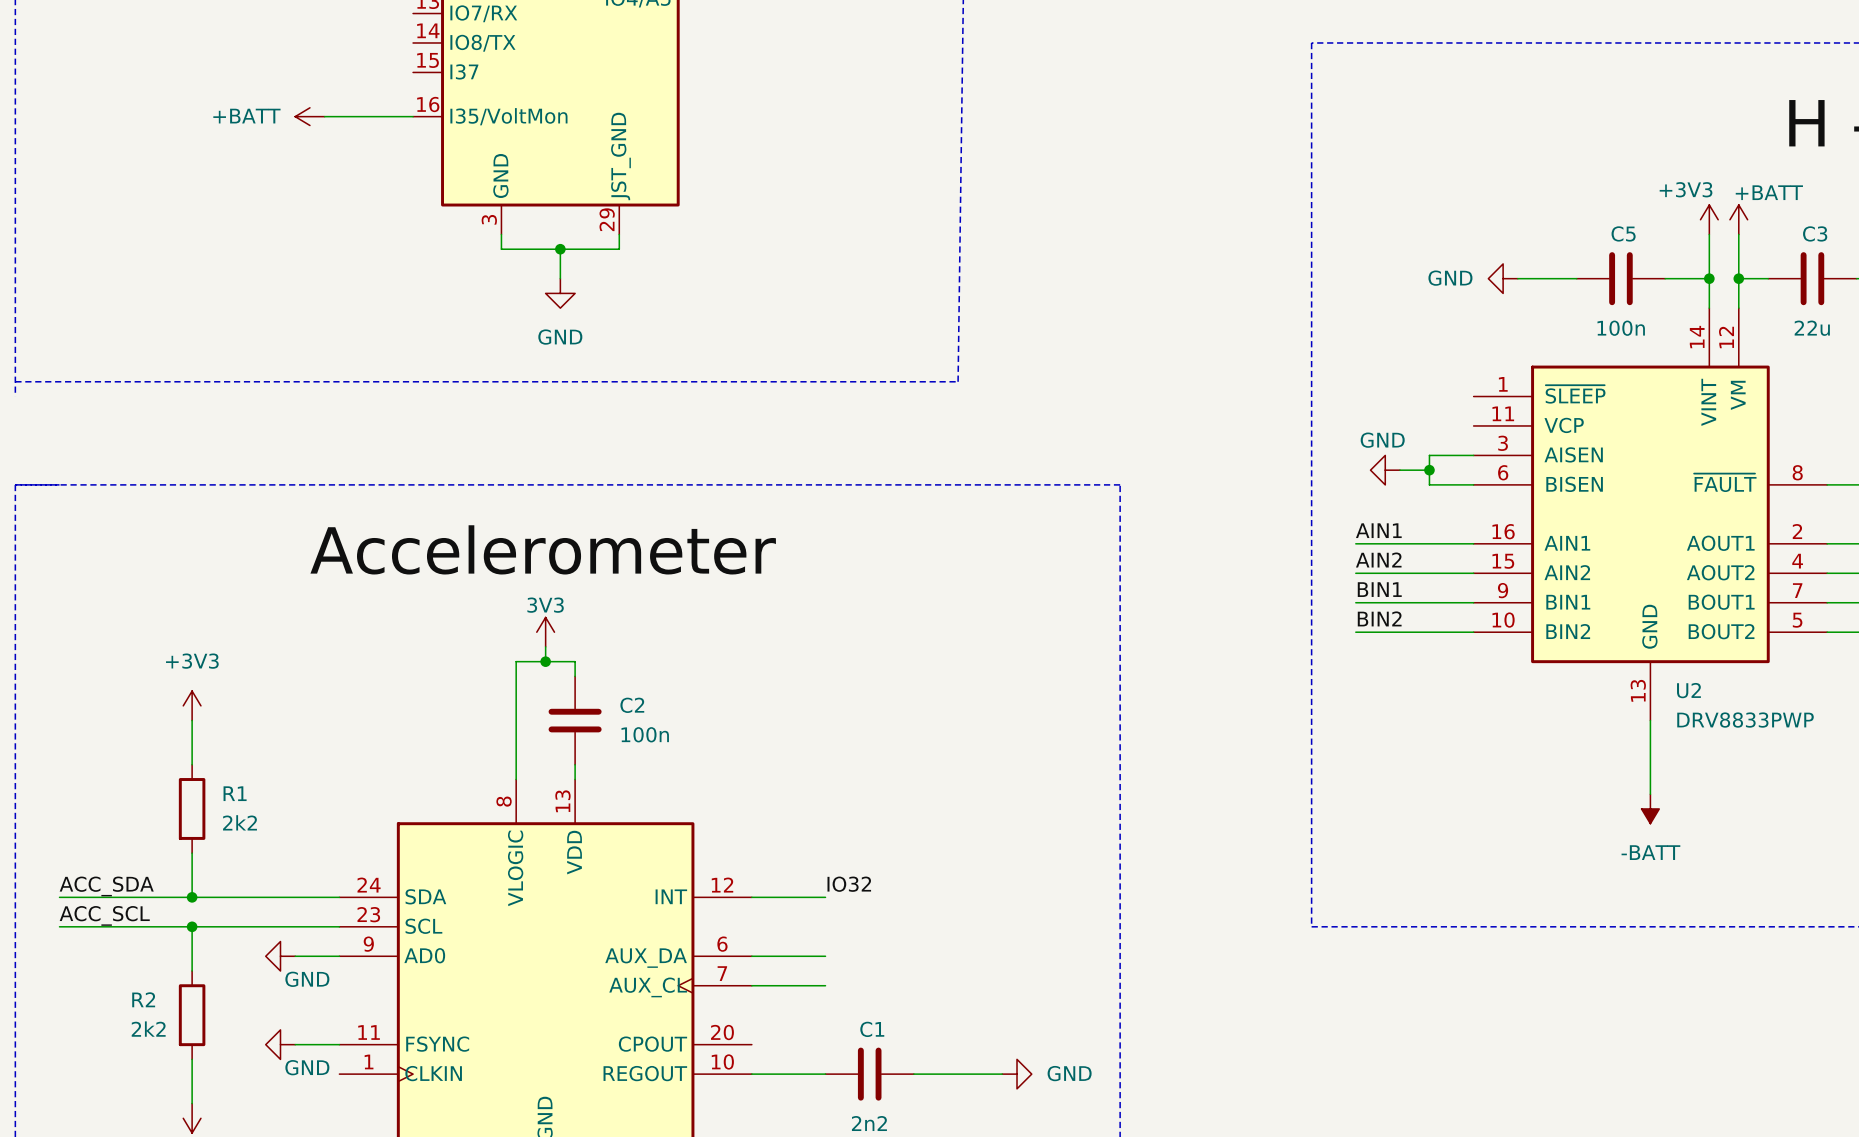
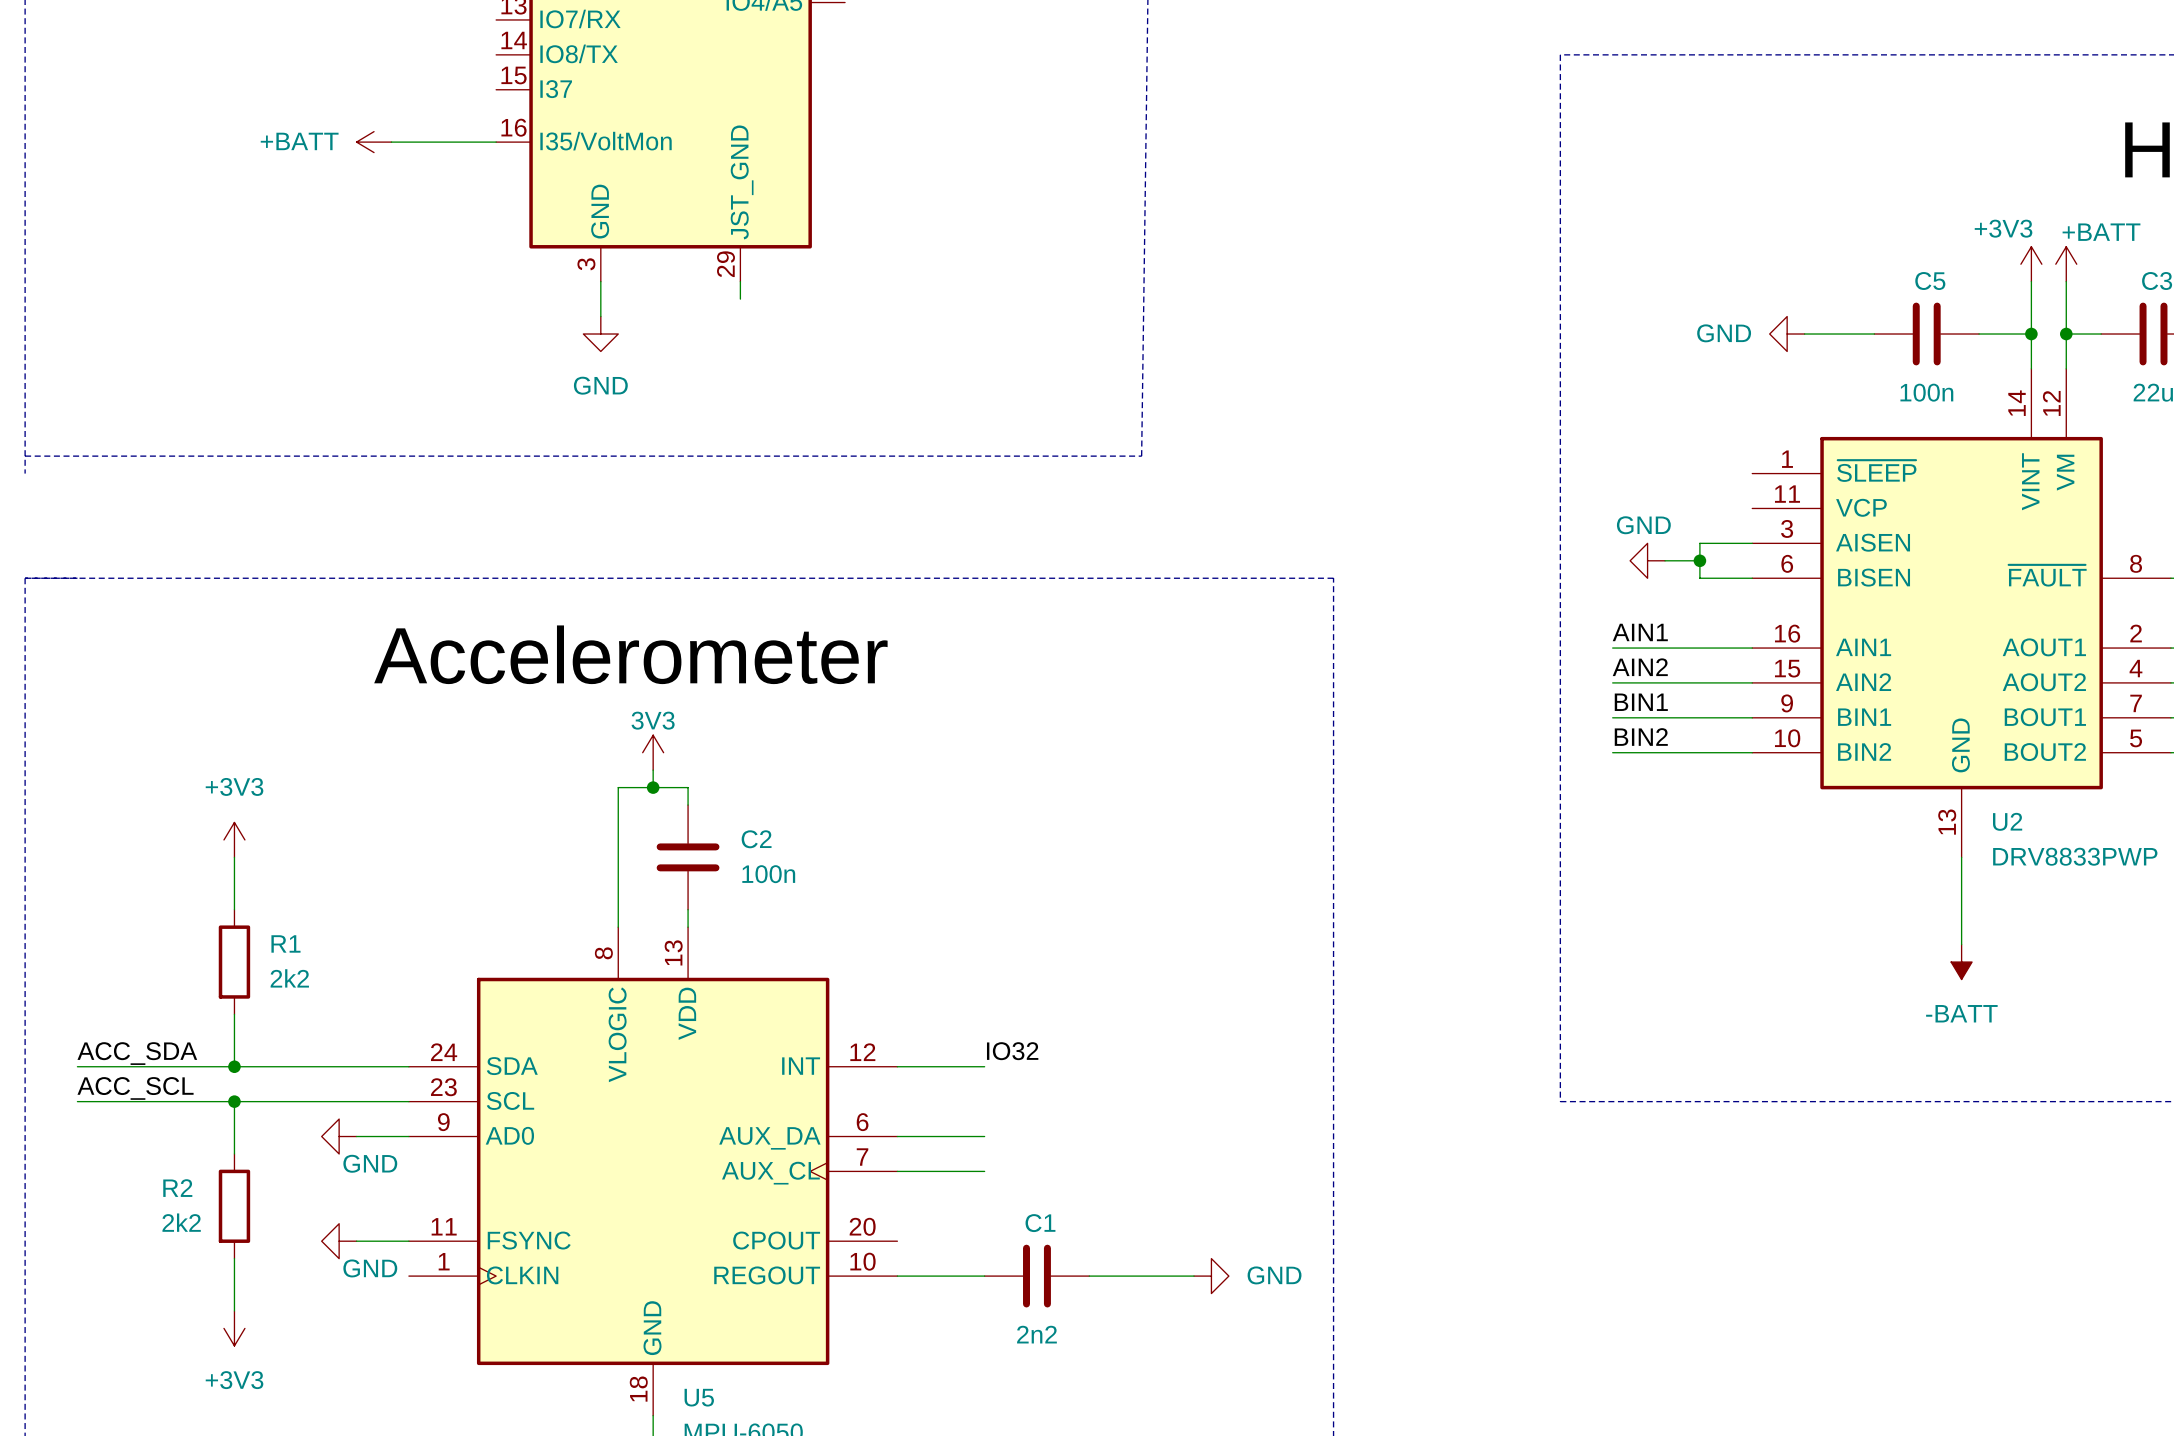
wire: (501, 249) (619, 249) -> (600, 299) (600, 316)
wire: (560, 249) (560, 278) -> none
junction: (560, 249) -> none
power symbol position: GND (560, 293) -> GND (600, 334)

